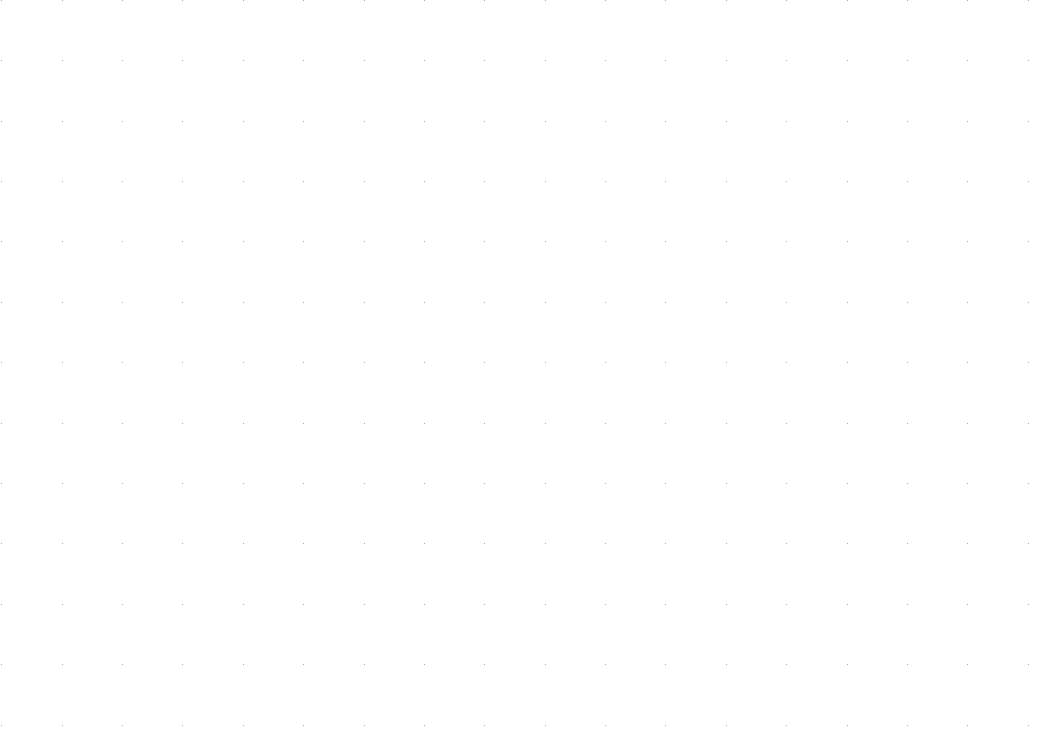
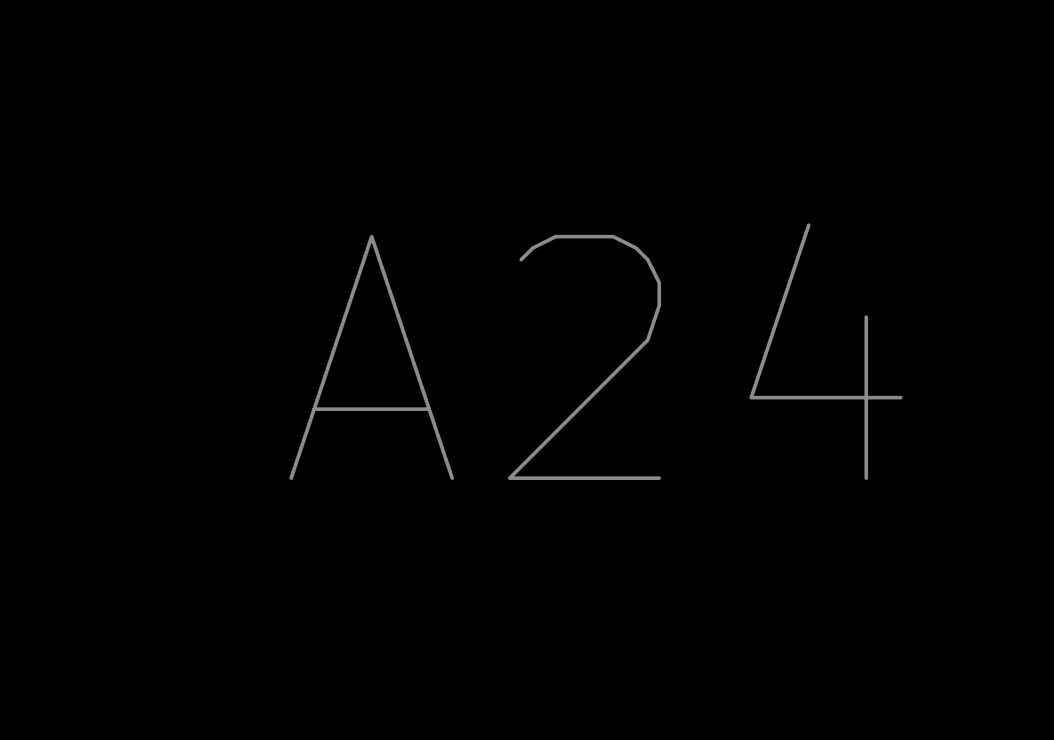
text: none -> A24 (595, 351)

